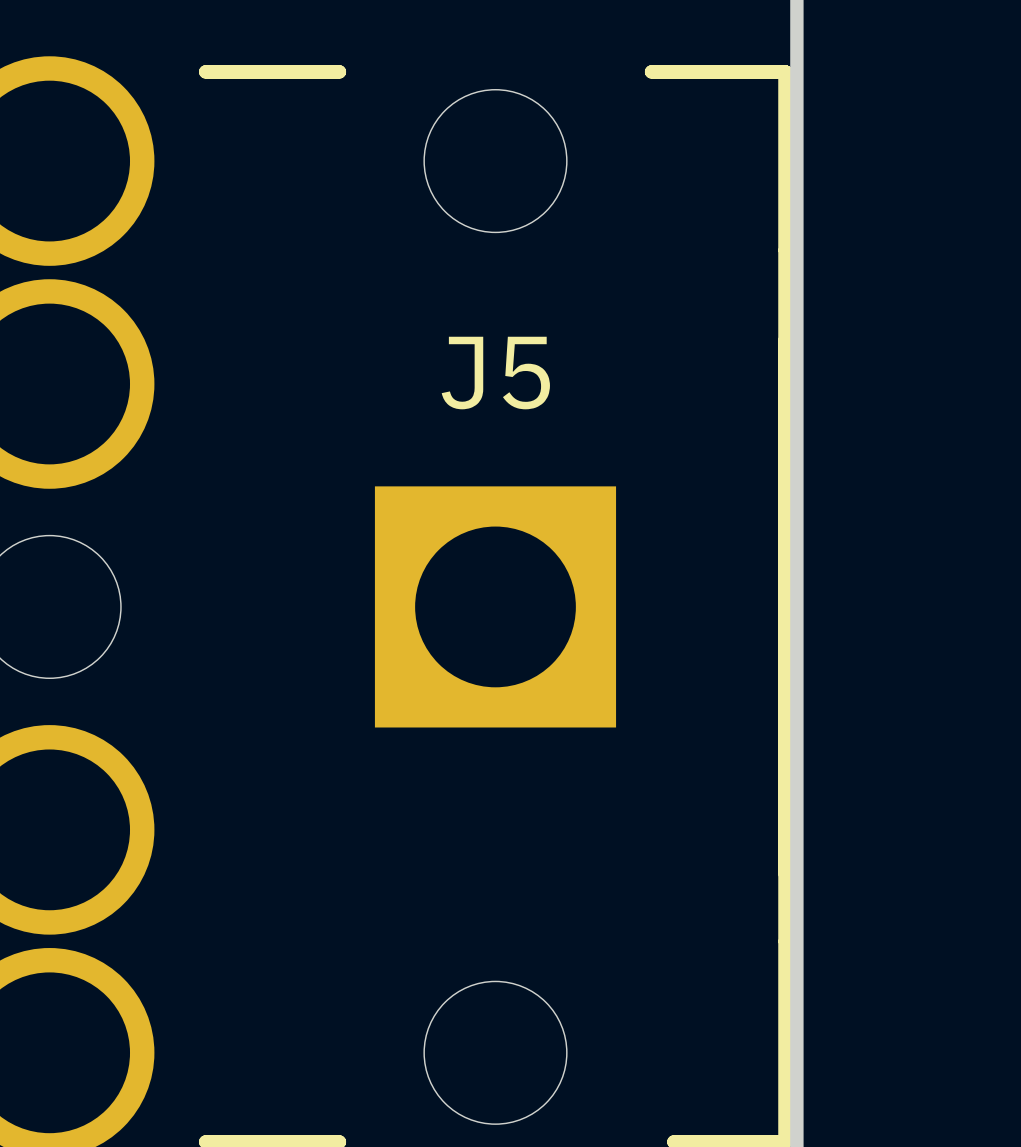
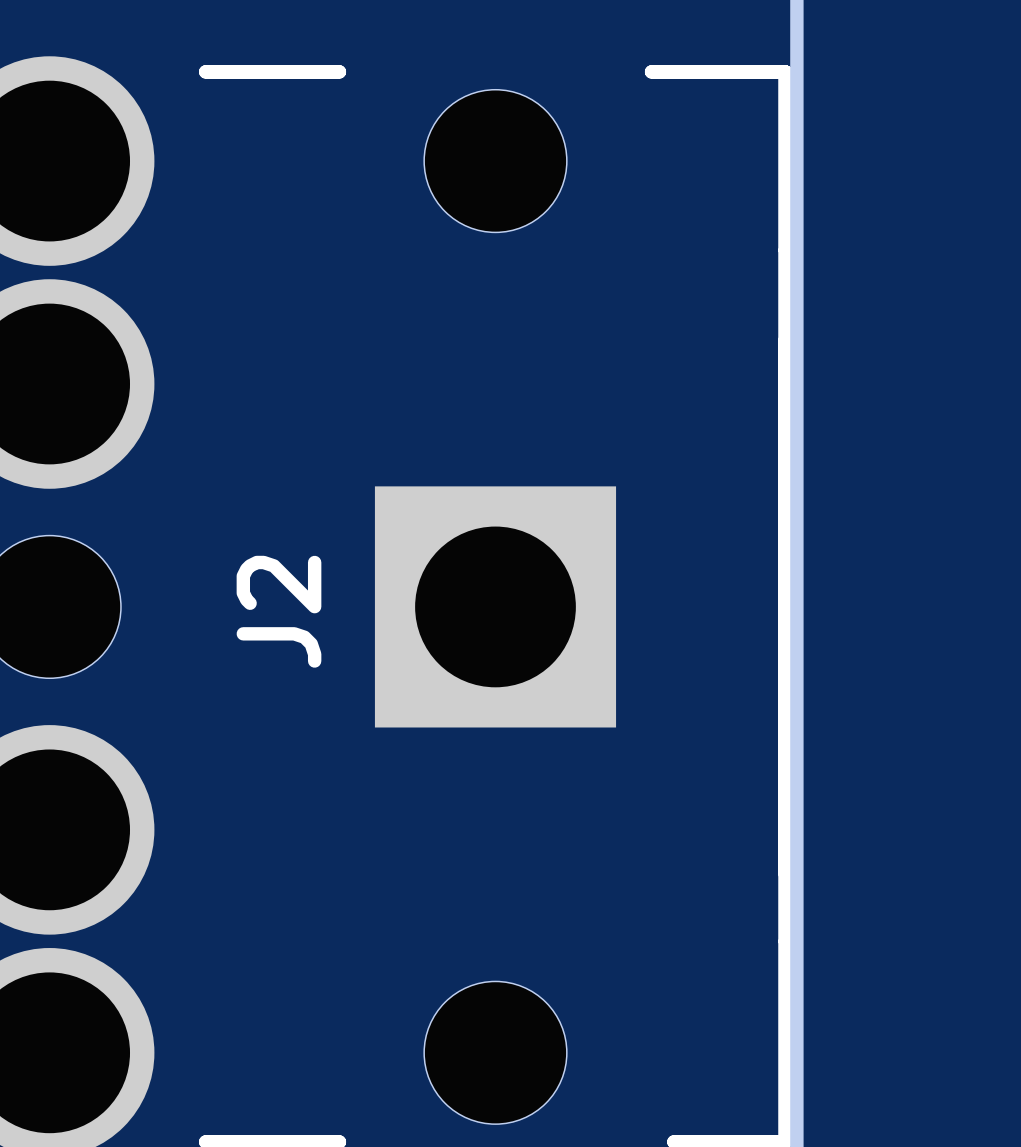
J5 name: J5 (495, 373) -> J2 (278, 611)

